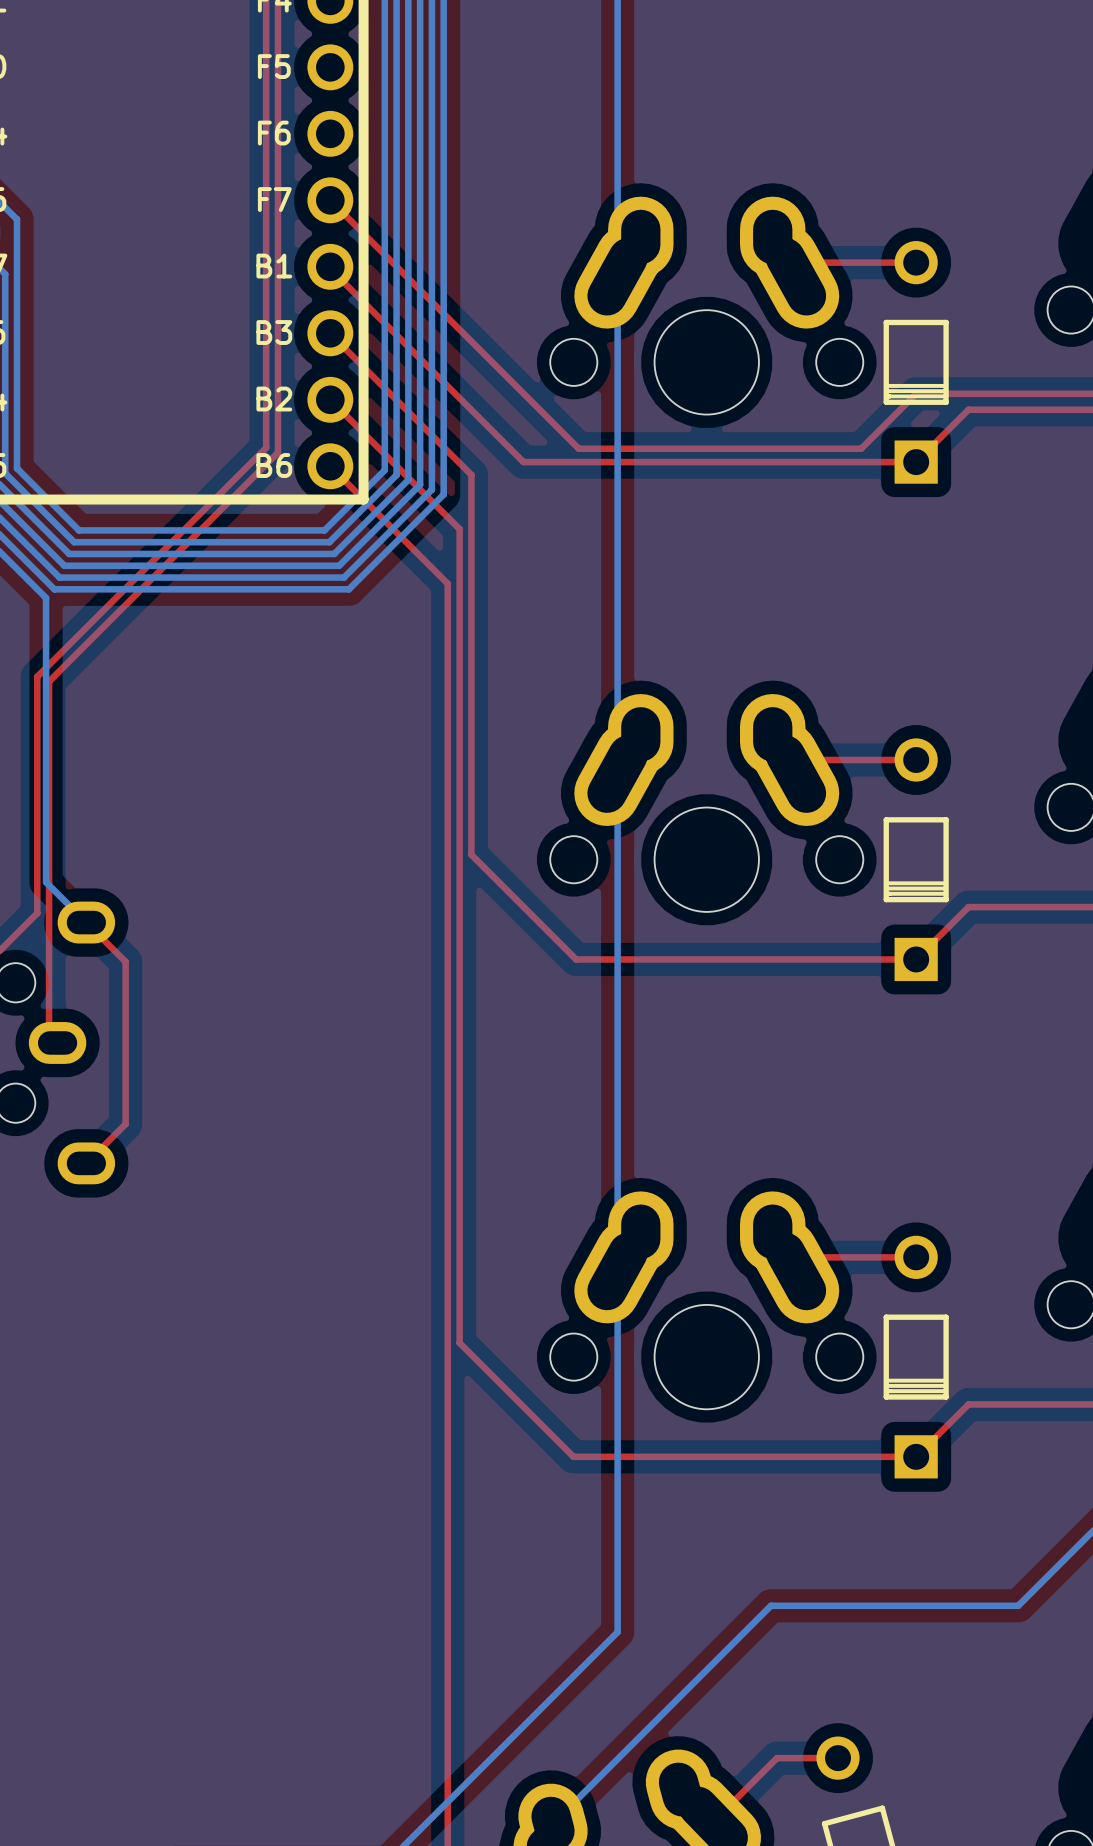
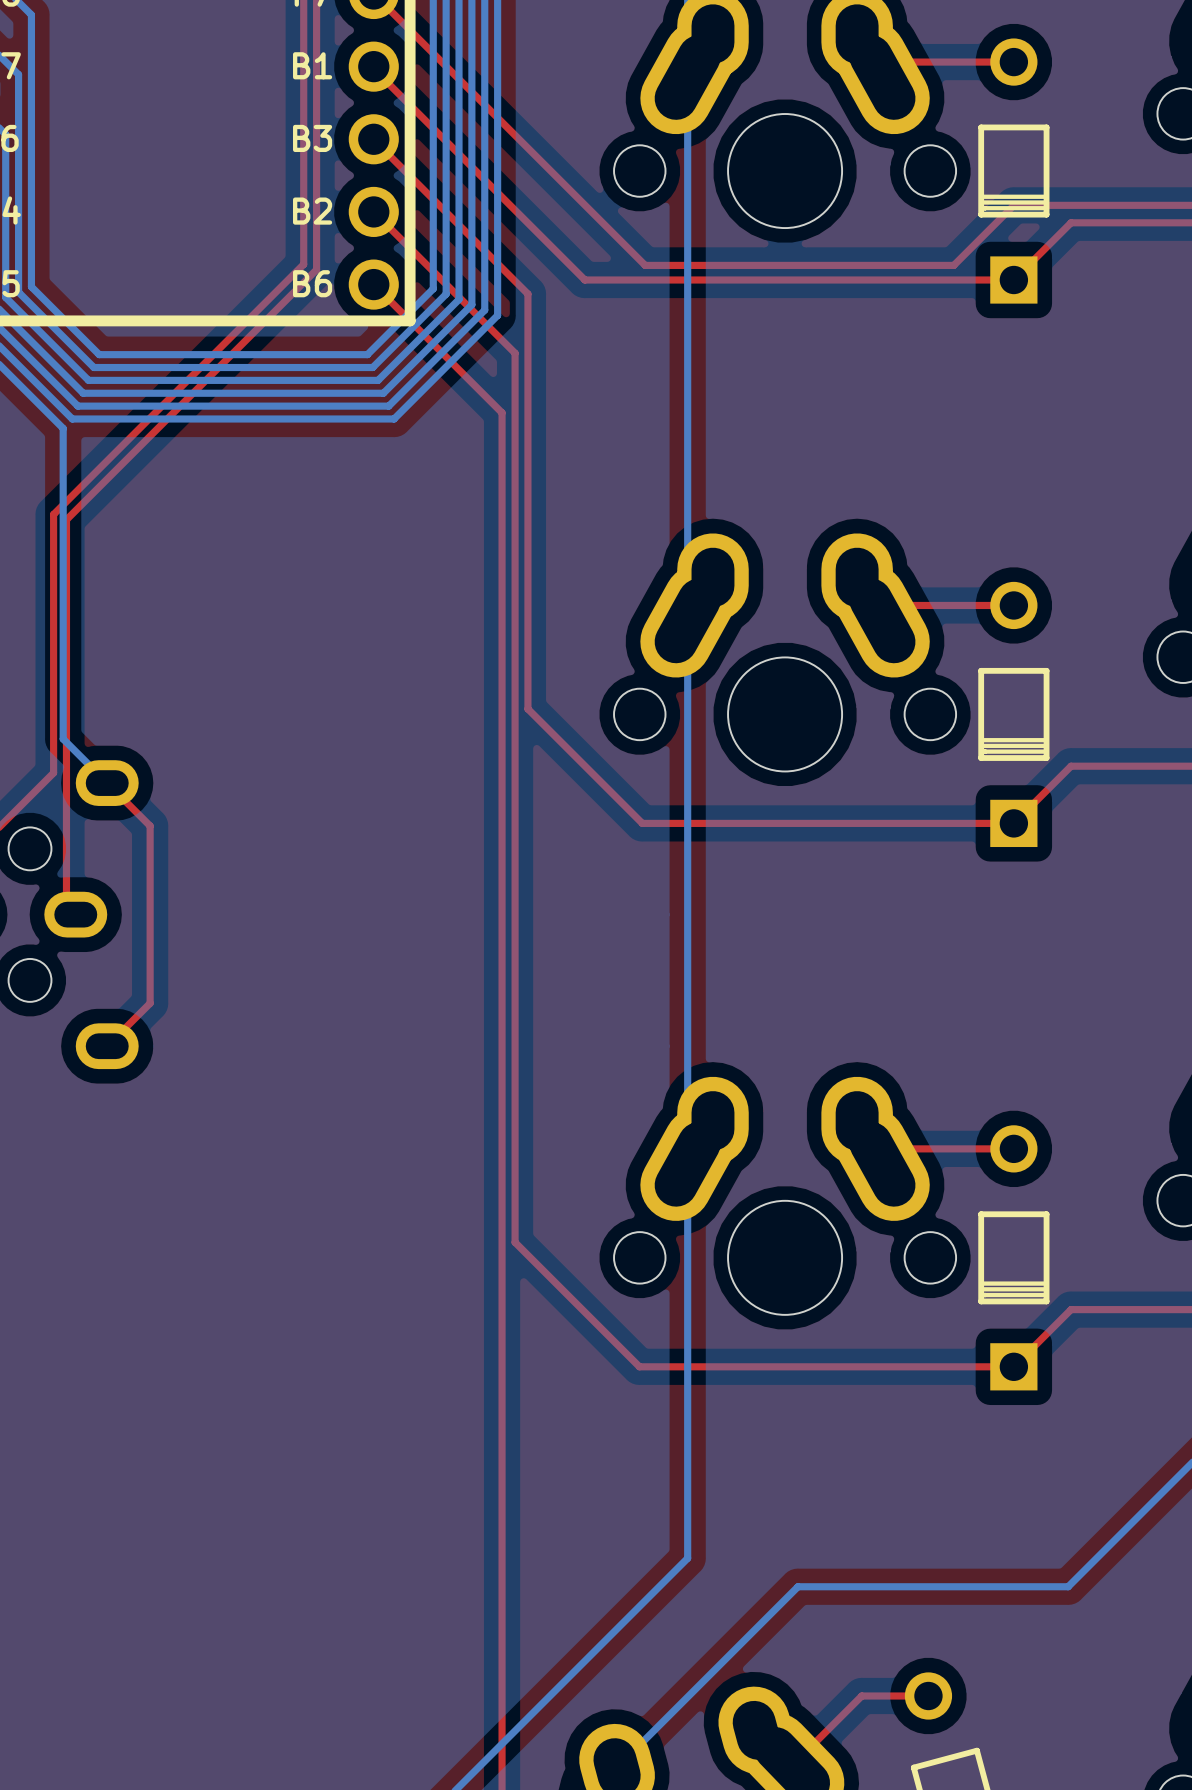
bottom track: (1018, 1605) (770, 1605) (718, 1658) -> (1125, 1529) (1068, 1586) (797, 1586)

